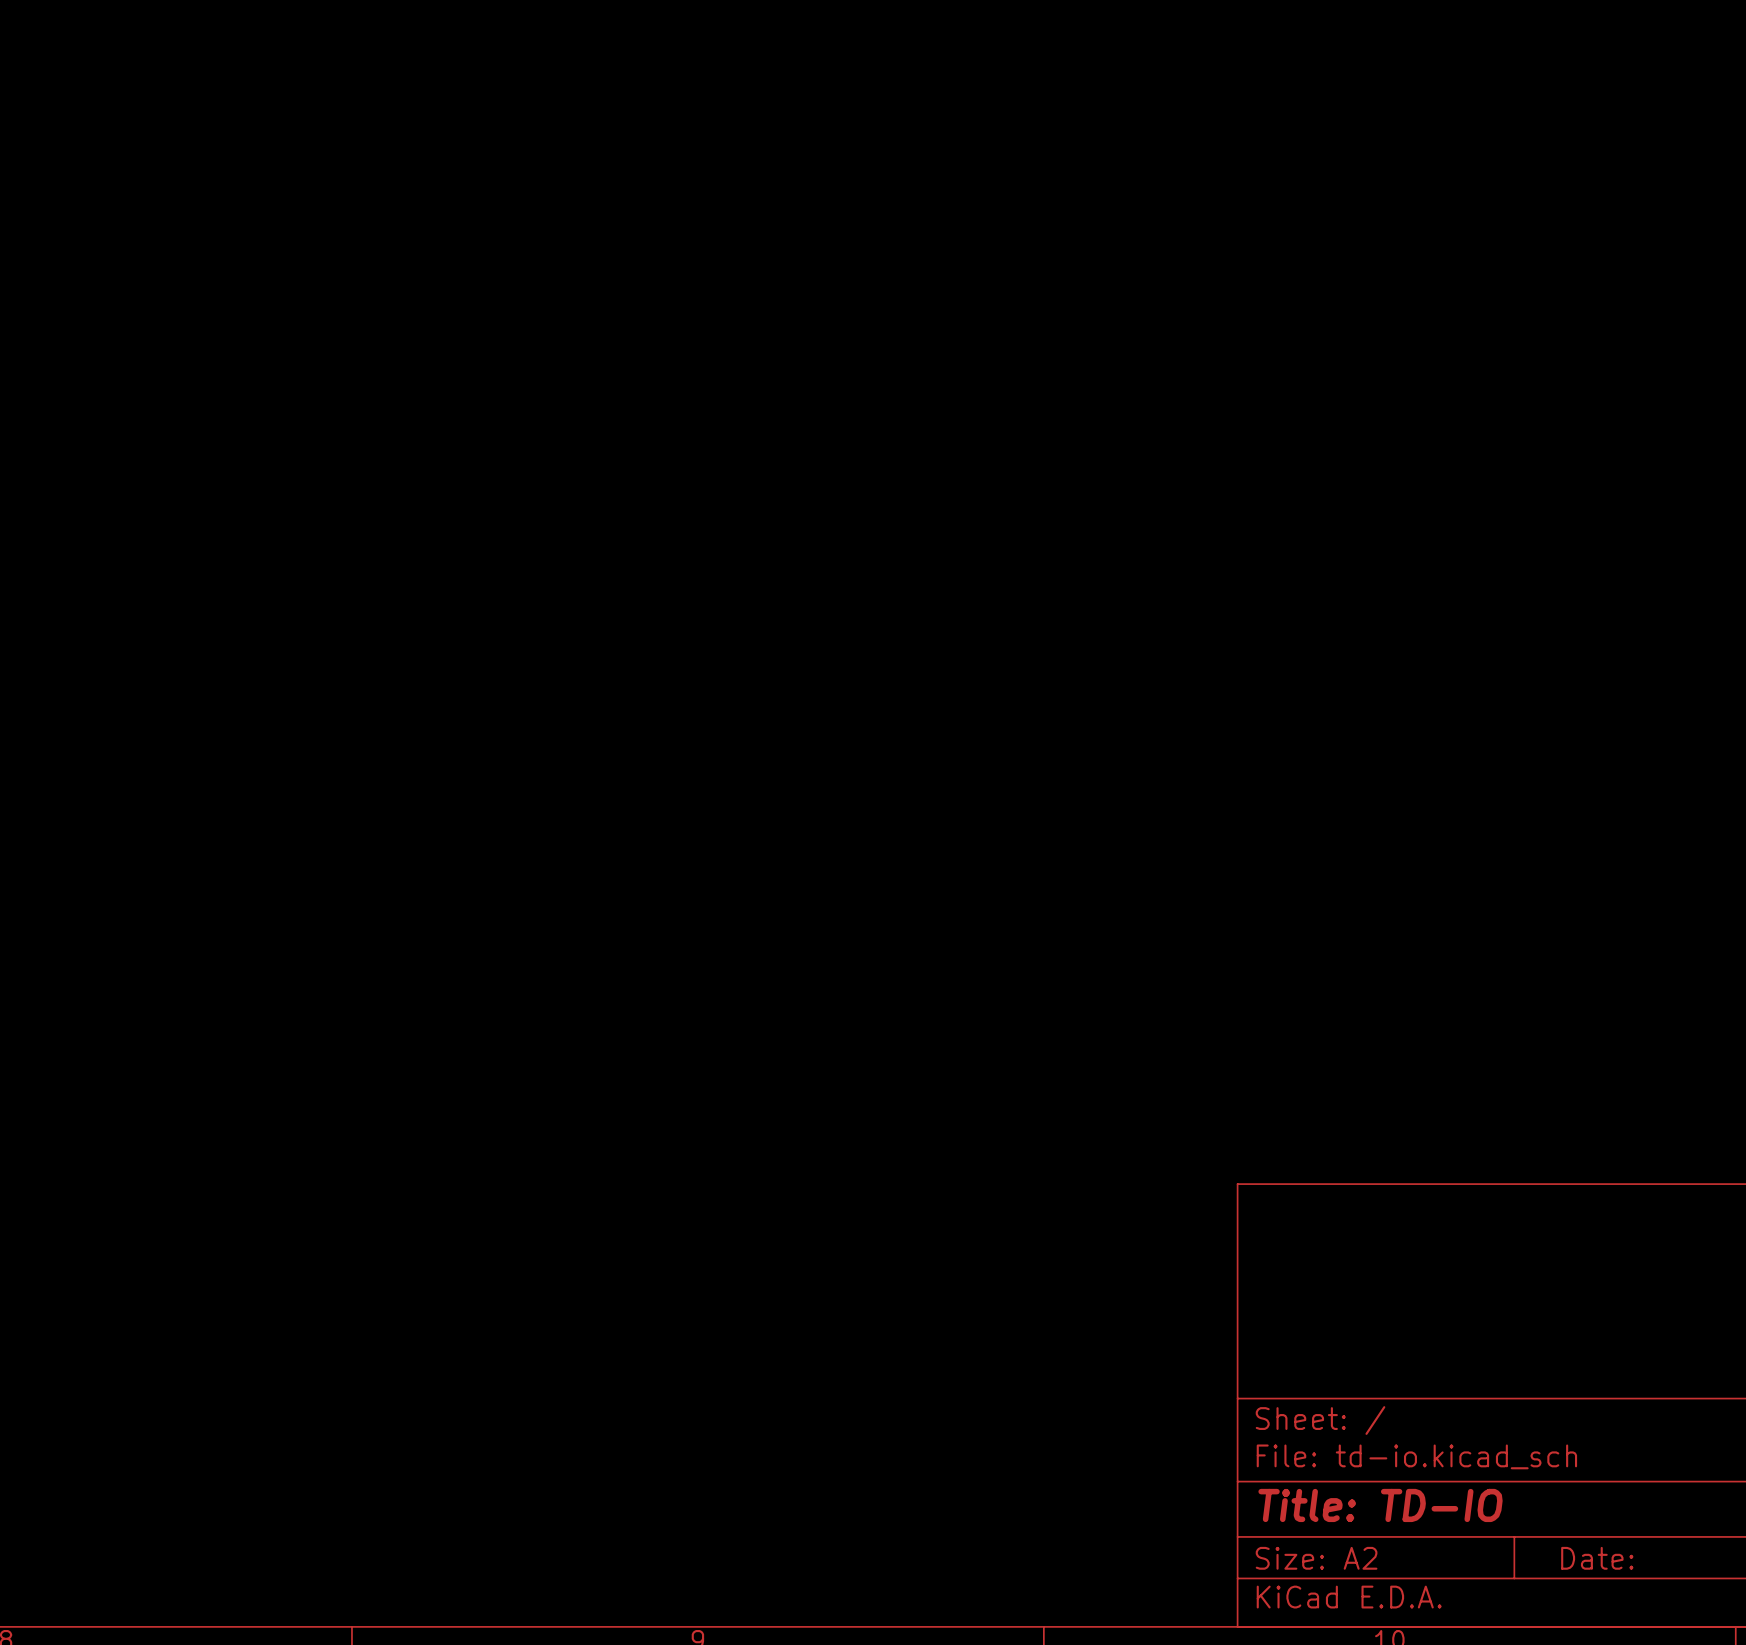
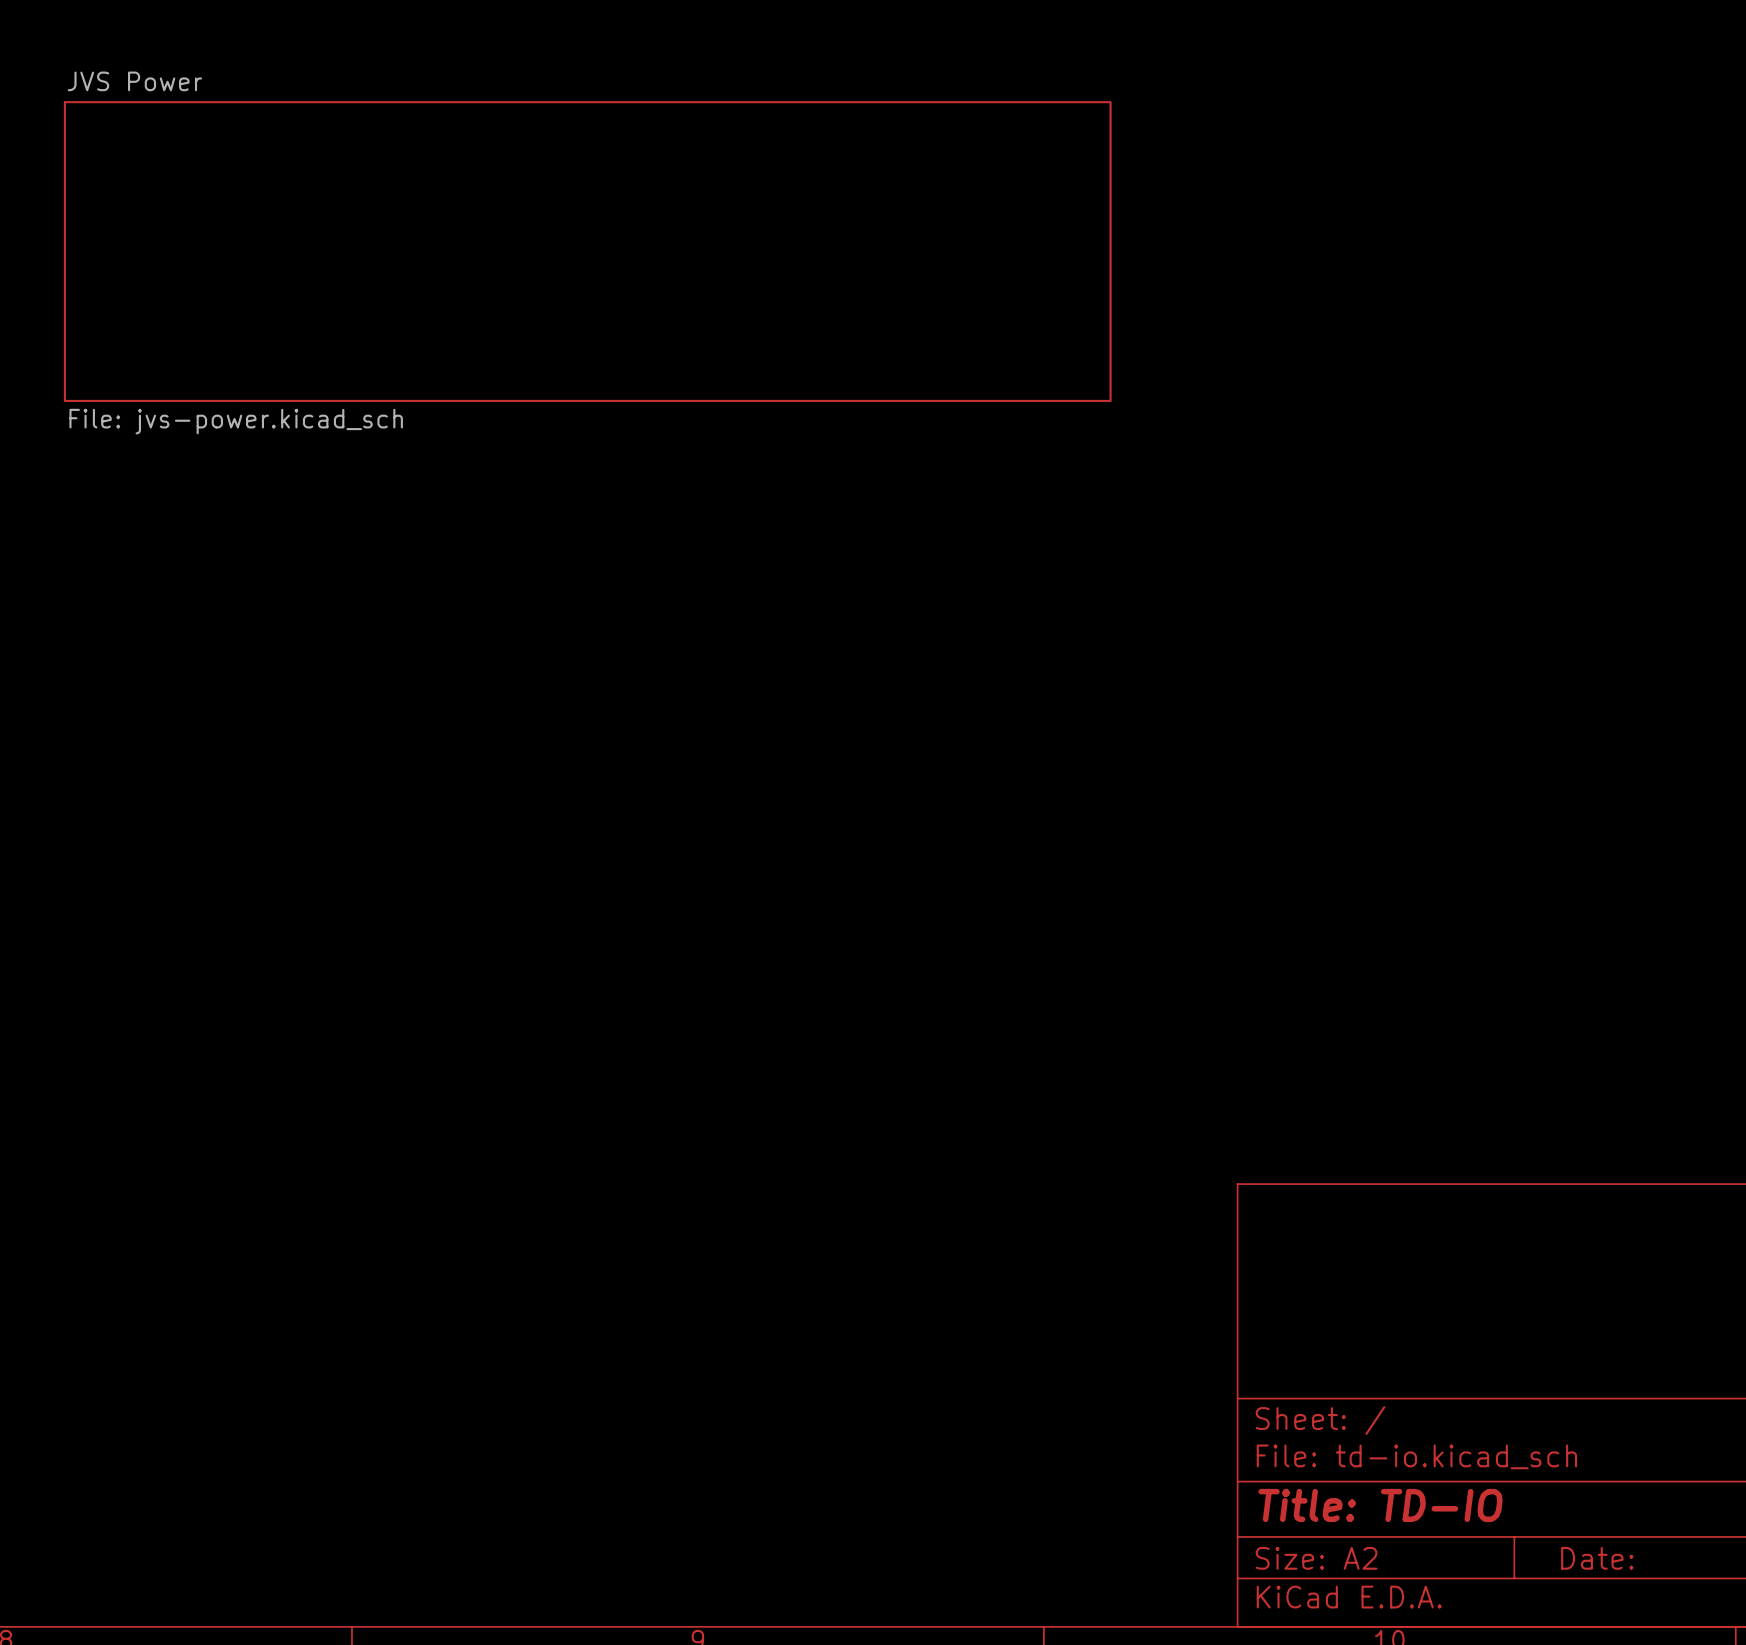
sheet JVS Power: none -> File: jvs-power.kicad_sch (587, 251)

